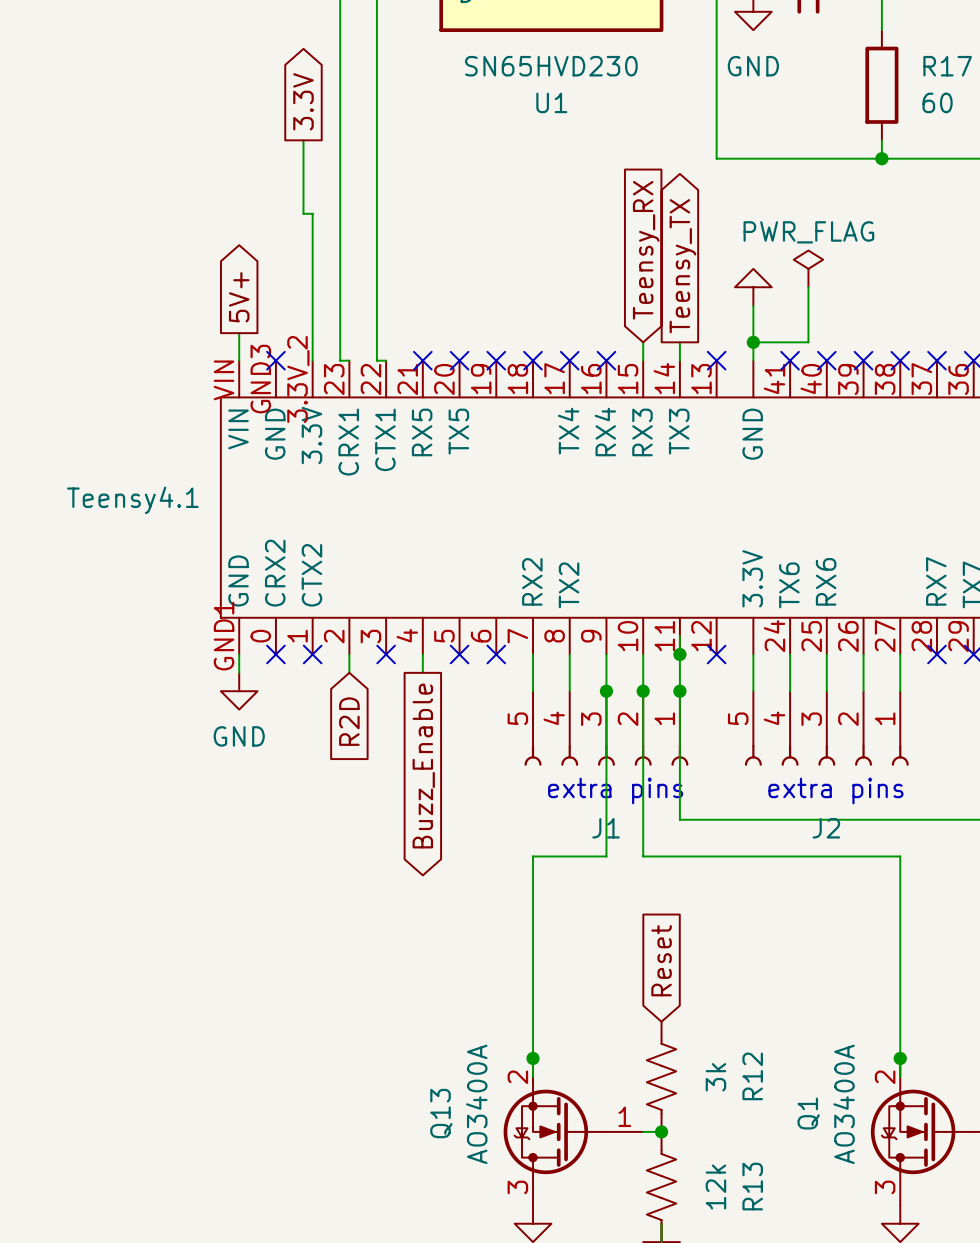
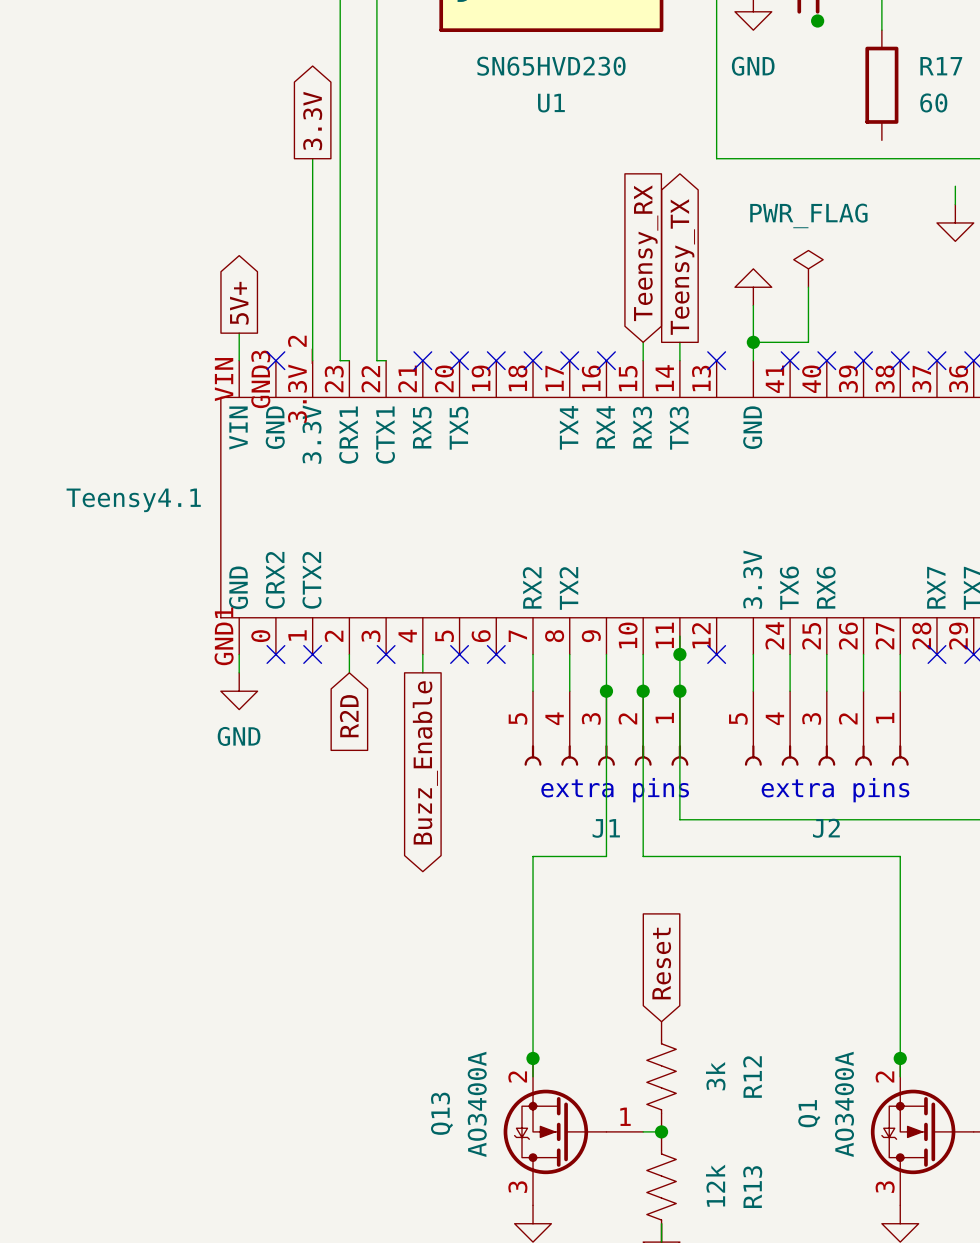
junction: none -> (817, 20)
global label position: 3.3V (303, 101) -> 3.3V (312, 121)
wire: (303, 140) (303, 213) (312, 213) -> (312, 158) (312, 213)
wire: (881, 140) (881, 158) -> (955, 186) (955, 204)
junction: (881, 158) -> none
power symbol: none -> (955, 222)
power symbol text position: PWR_FLAG (808, 232) -> PWR_FLAG (808, 215)

